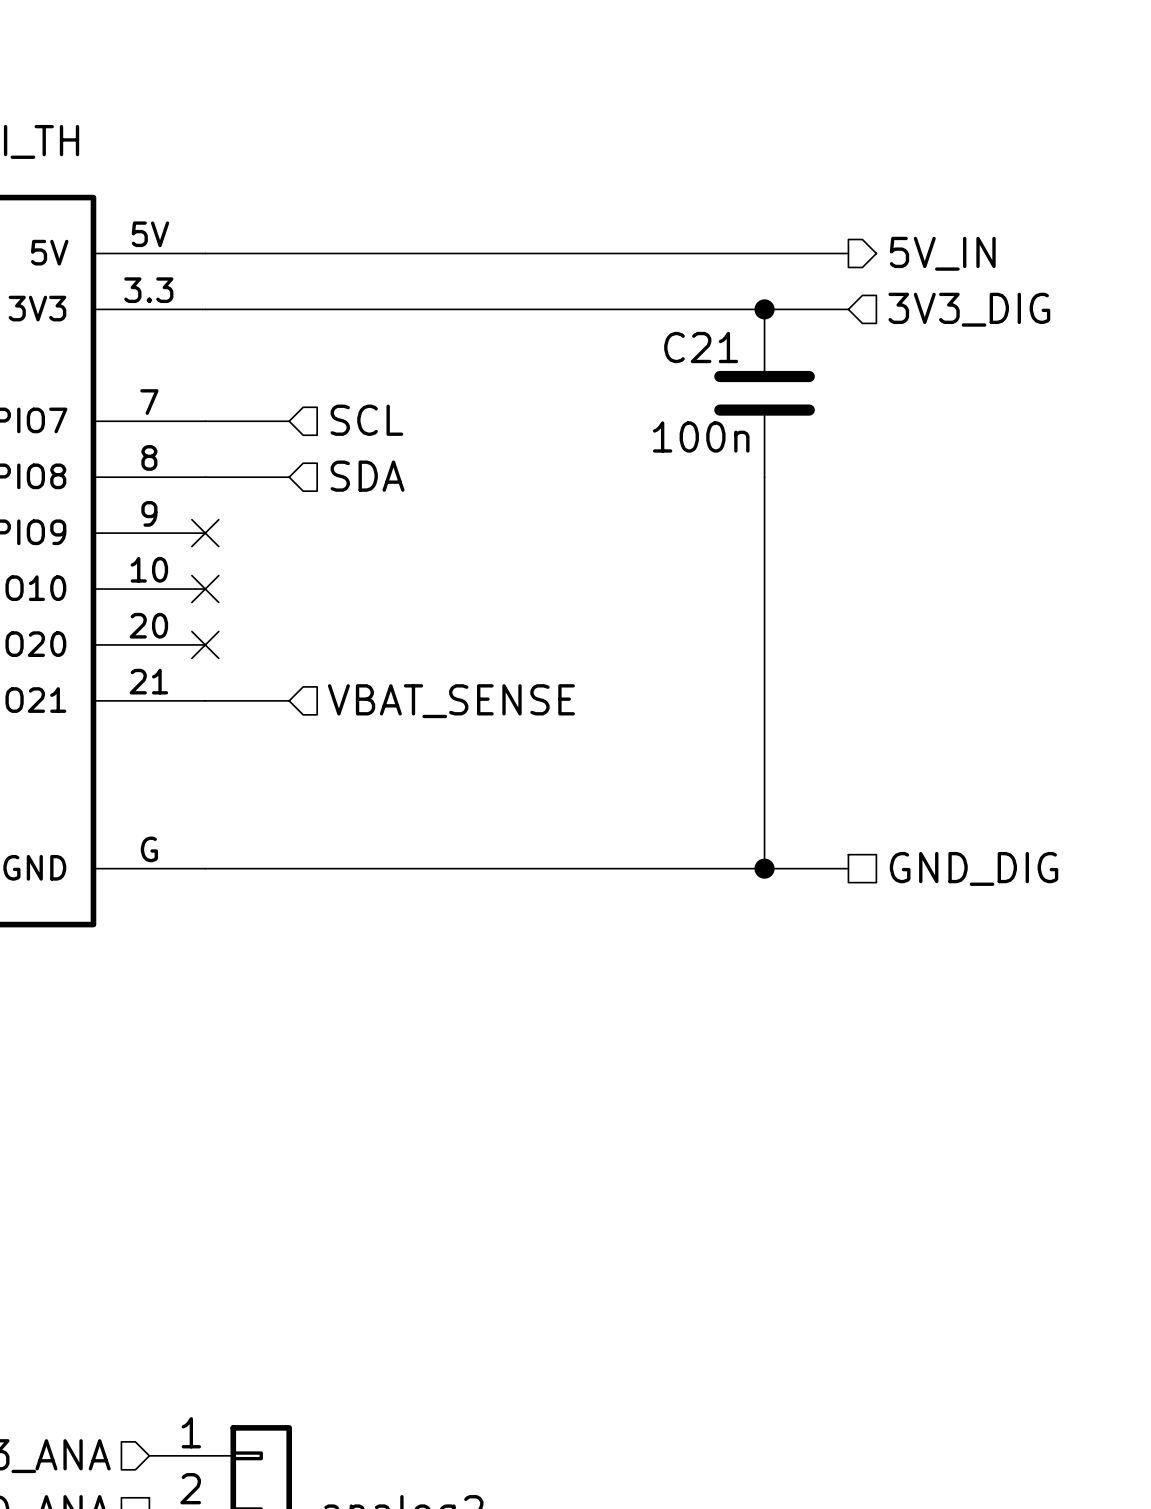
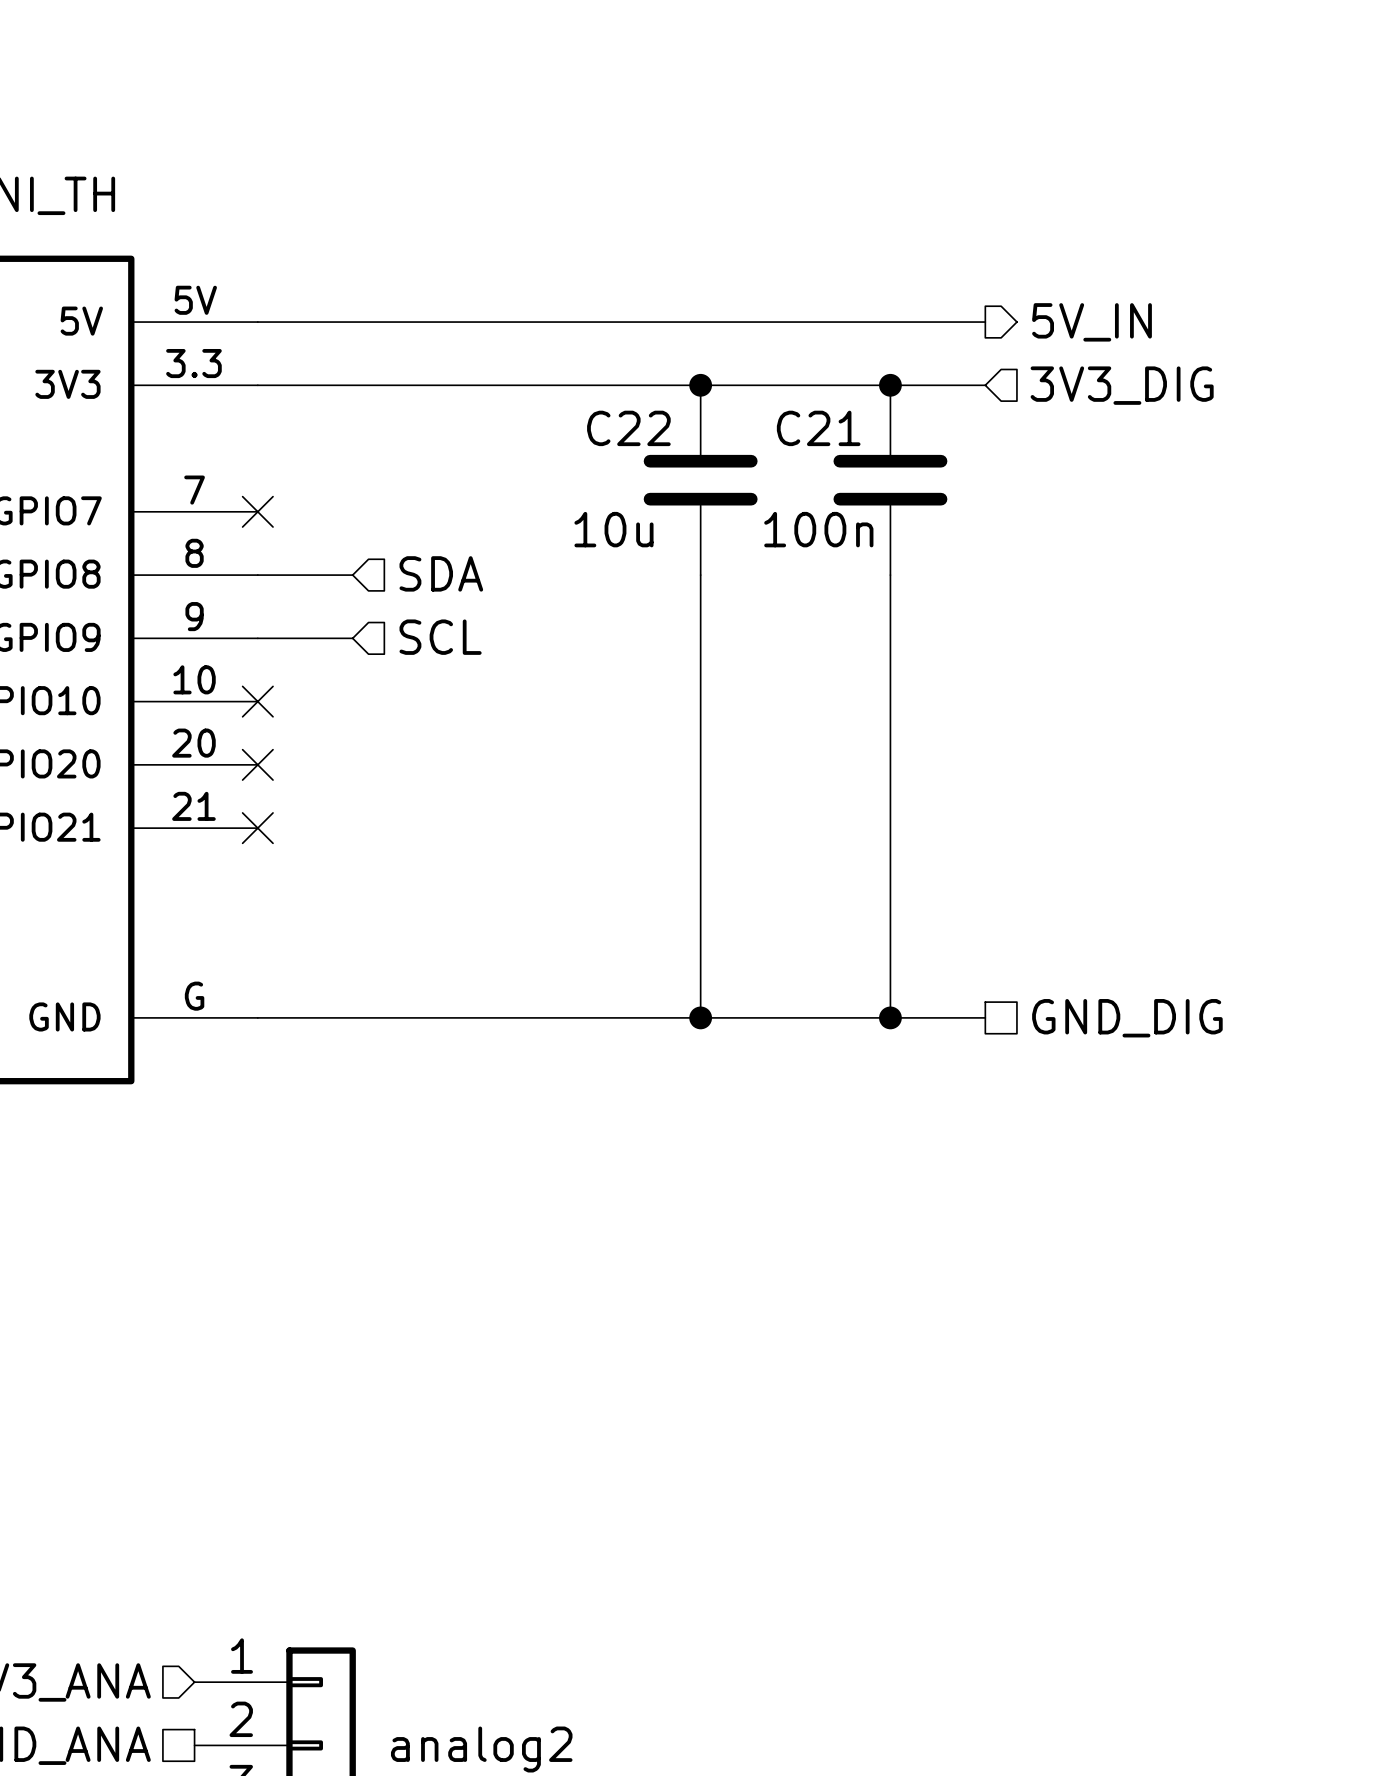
junction: none -> (700, 385)
C22: none -> 10u (700, 480)
hierarchical label position: SCL (366, 420) -> SCL (440, 637)
wire: (205, 421) (289, 421) -> (257, 638) (352, 638)
no-connect mark: none -> (257, 511)
wire: none -> (700, 575) (700, 1017)
no-connect mark: (205, 533) -> none
wire: (205, 700) (289, 700) -> none
no-connect mark: none -> (257, 828)
hierarchical label: VBAT_SENSE (451, 701) -> none
junction: none -> (700, 1017)

